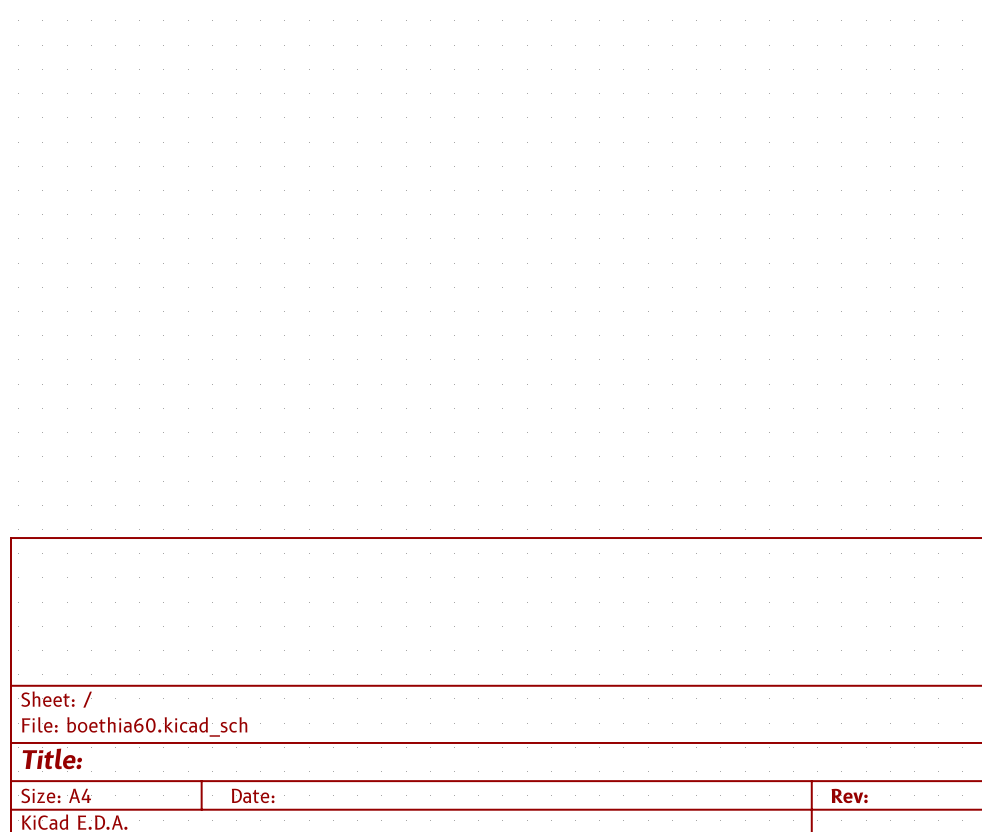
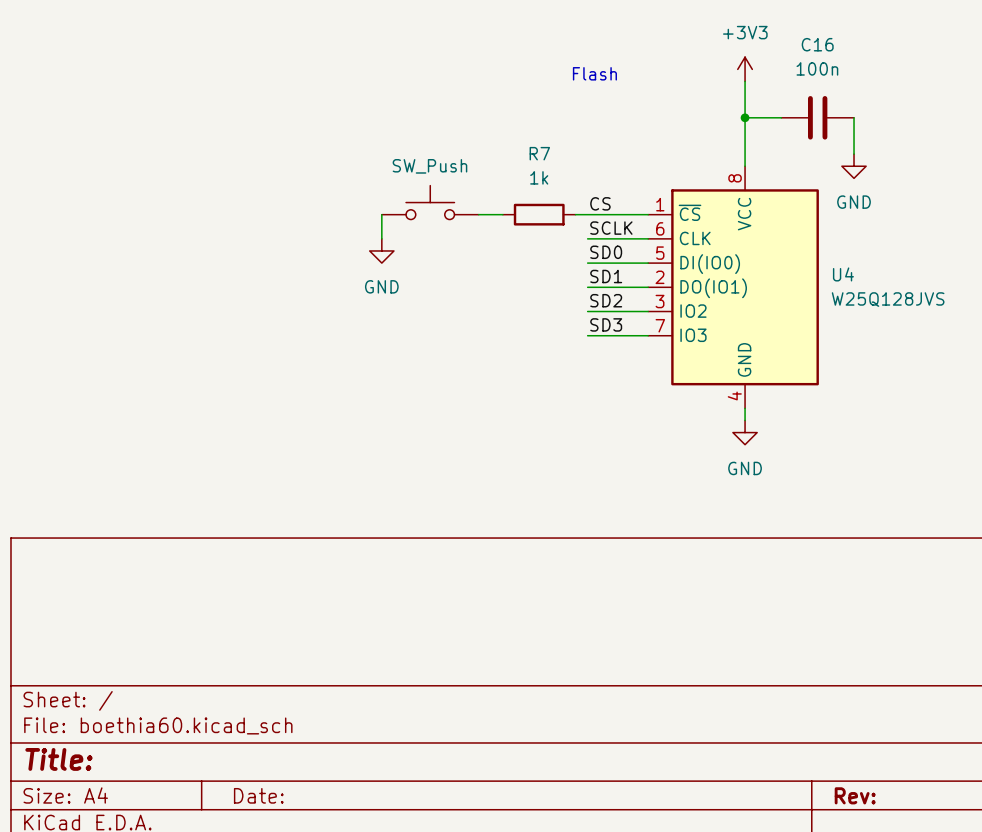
power symbol: none -> +3V3 (745, 69)
text: none -> Flash (594, 73)
wire: none -> (745, 81) (745, 166)
wire: none -> (745, 117) (781, 117)
junction: none -> (745, 117)
C16: none -> 100n (817, 117)
wire: none -> (854, 117) (854, 154)
power symbol: none -> GND (854, 166)
part: none -> SW_Push (430, 202)
label: none -> CS (600, 203)
wire: none -> (381, 214) (381, 238)
wire: none -> (478, 214) (502, 214)
R7: none -> 1k (539, 214)
wire: none -> (575, 214) (648, 214)
label: none -> SCLK (611, 228)
wire: none -> (587, 238) (648, 238)
power symbol: none -> GND (381, 250)
label: none -> SD0 (606, 252)
wire: none -> (587, 263) (648, 263)
label: none -> SD1 (606, 276)
wire: none -> (587, 287) (648, 287)
U4: none -> W25Q128JVS (733, 287)
label: none -> SD2 (606, 300)
wire: none -> (587, 311) (648, 311)
label: none -> SD3 (606, 324)
wire: none -> (587, 335) (648, 335)
wire: none -> (745, 408) (745, 420)
power symbol: none -> GND (745, 432)

